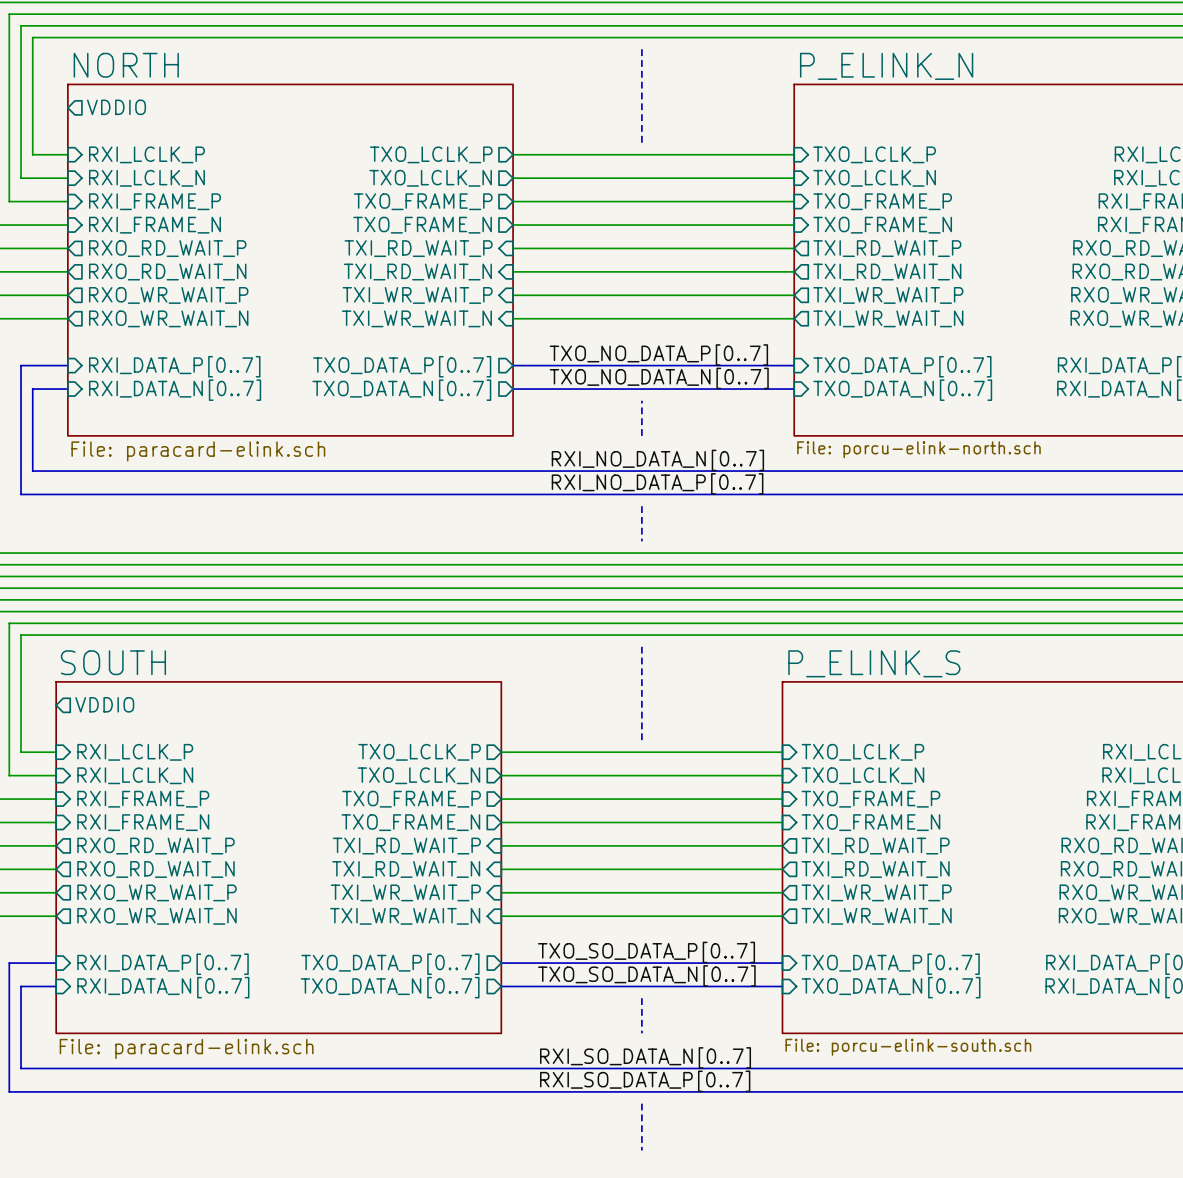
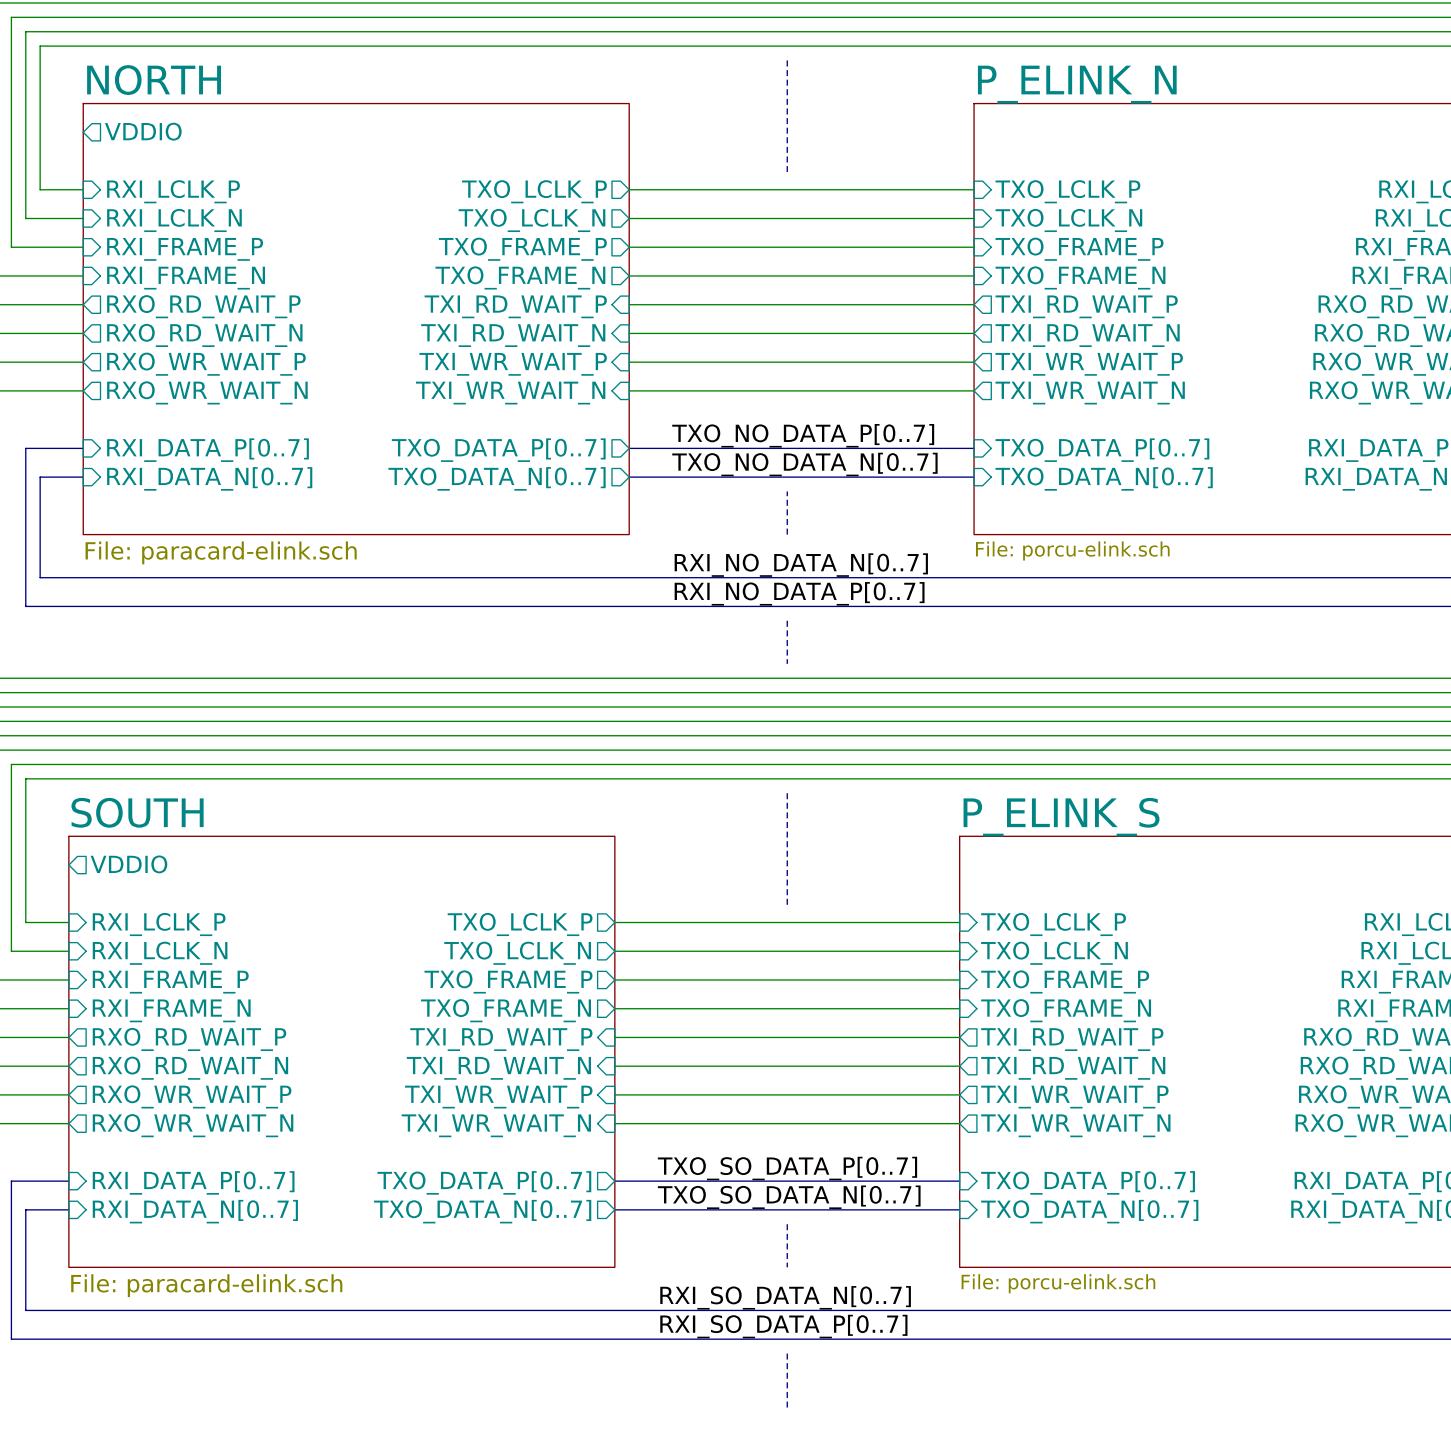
sheet P_ELINK_N value: File: porcu-elink-north.sch (918, 449) -> File: porcu-elink.sch (1072, 550)
sheet P_ELINK_S value: File: porcu-elink-south.sch (908, 1047) -> File: porcu-elink.sch (1058, 1283)

